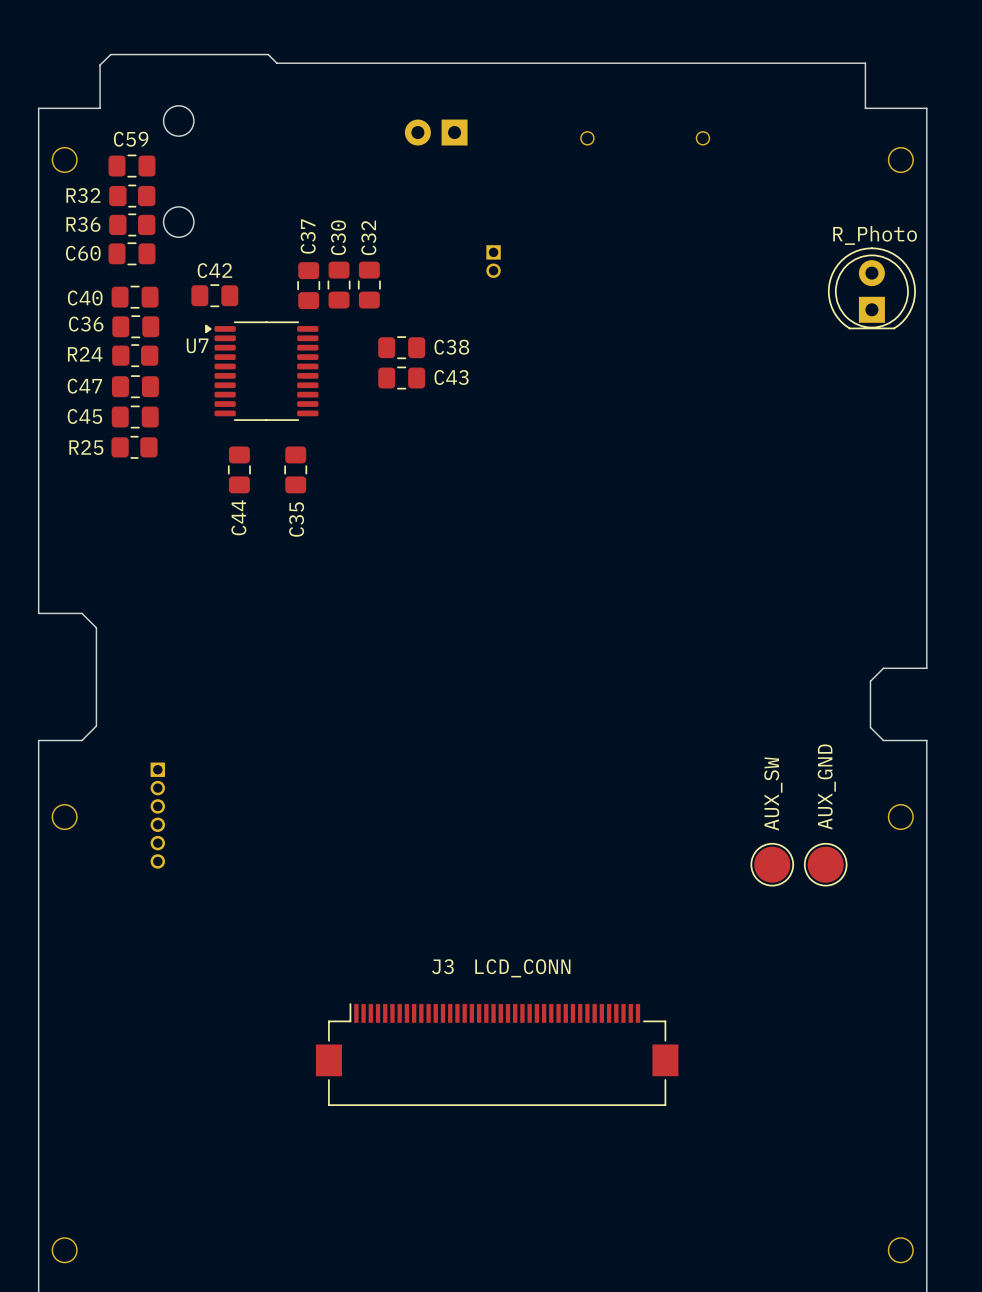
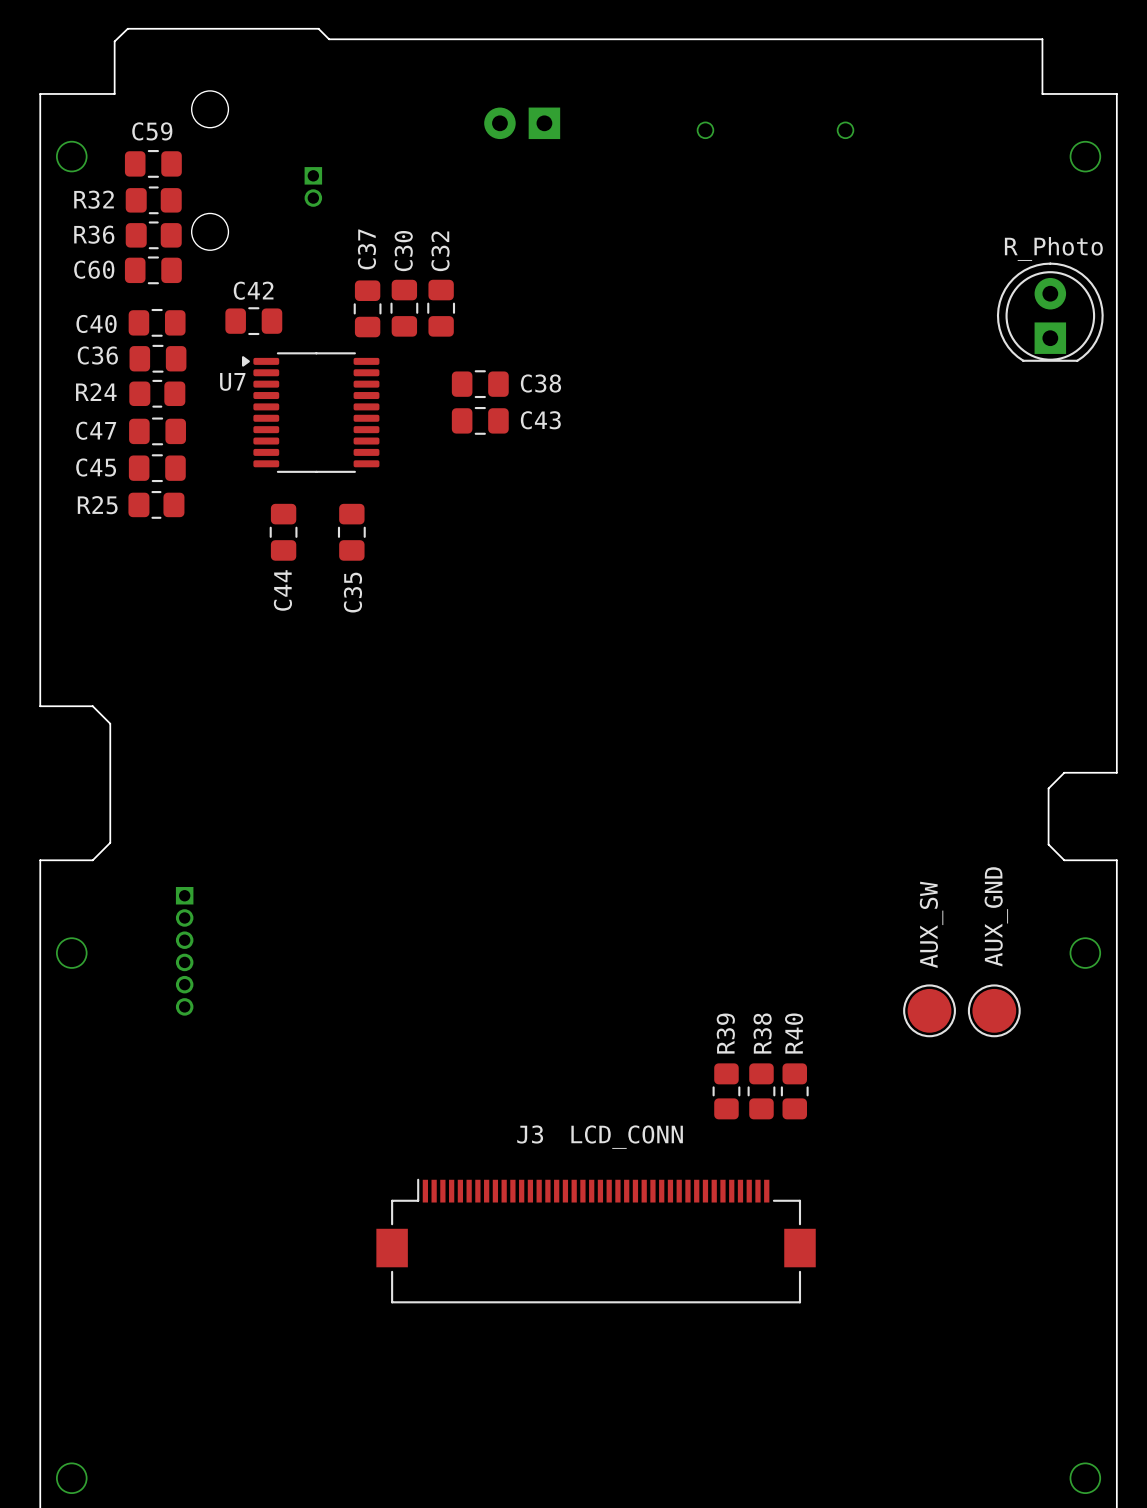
part position: (493, 261) -> (313, 186)
R39: none -> (726, 1091)
R38: none -> (761, 1091)
R40: none -> (794, 1091)

